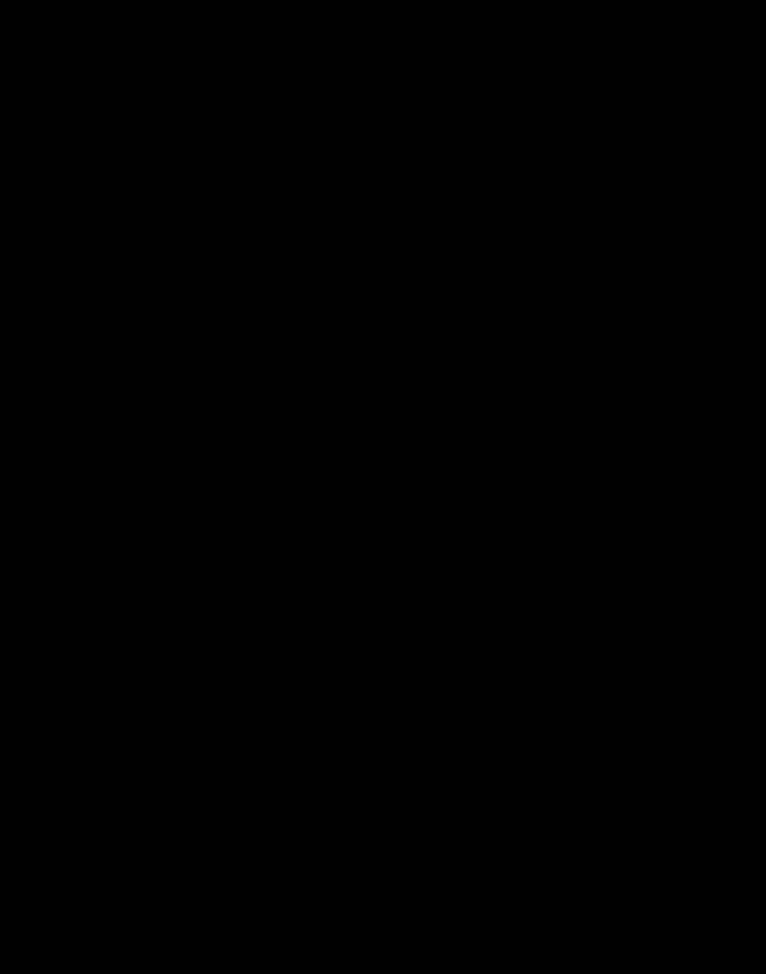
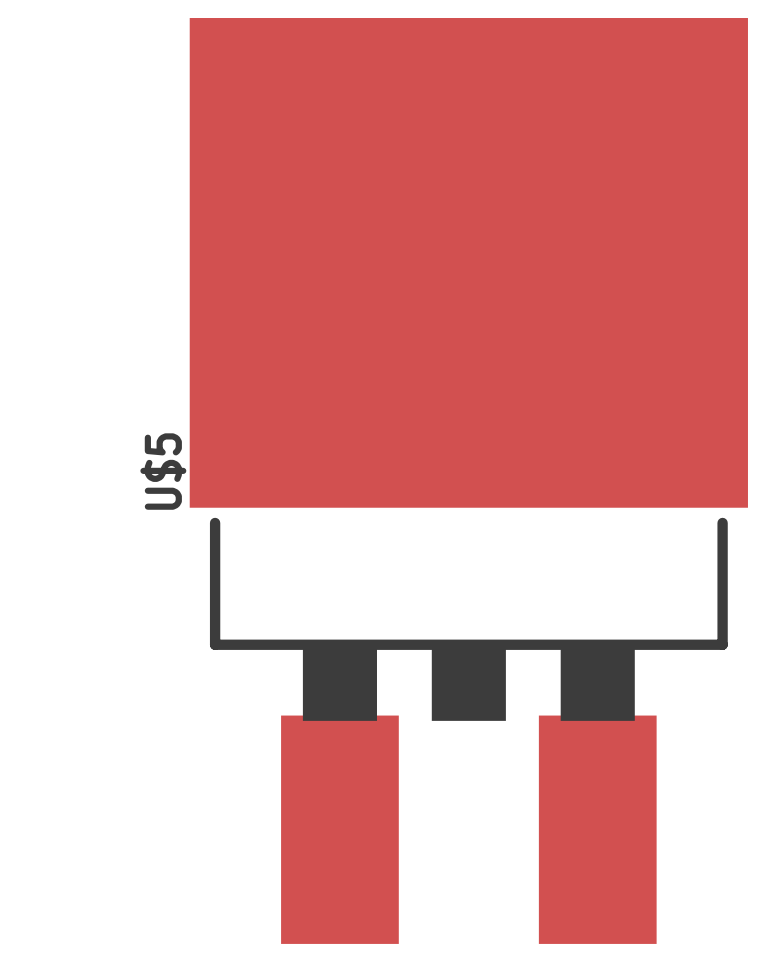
U$5: none -> (468, 480)

